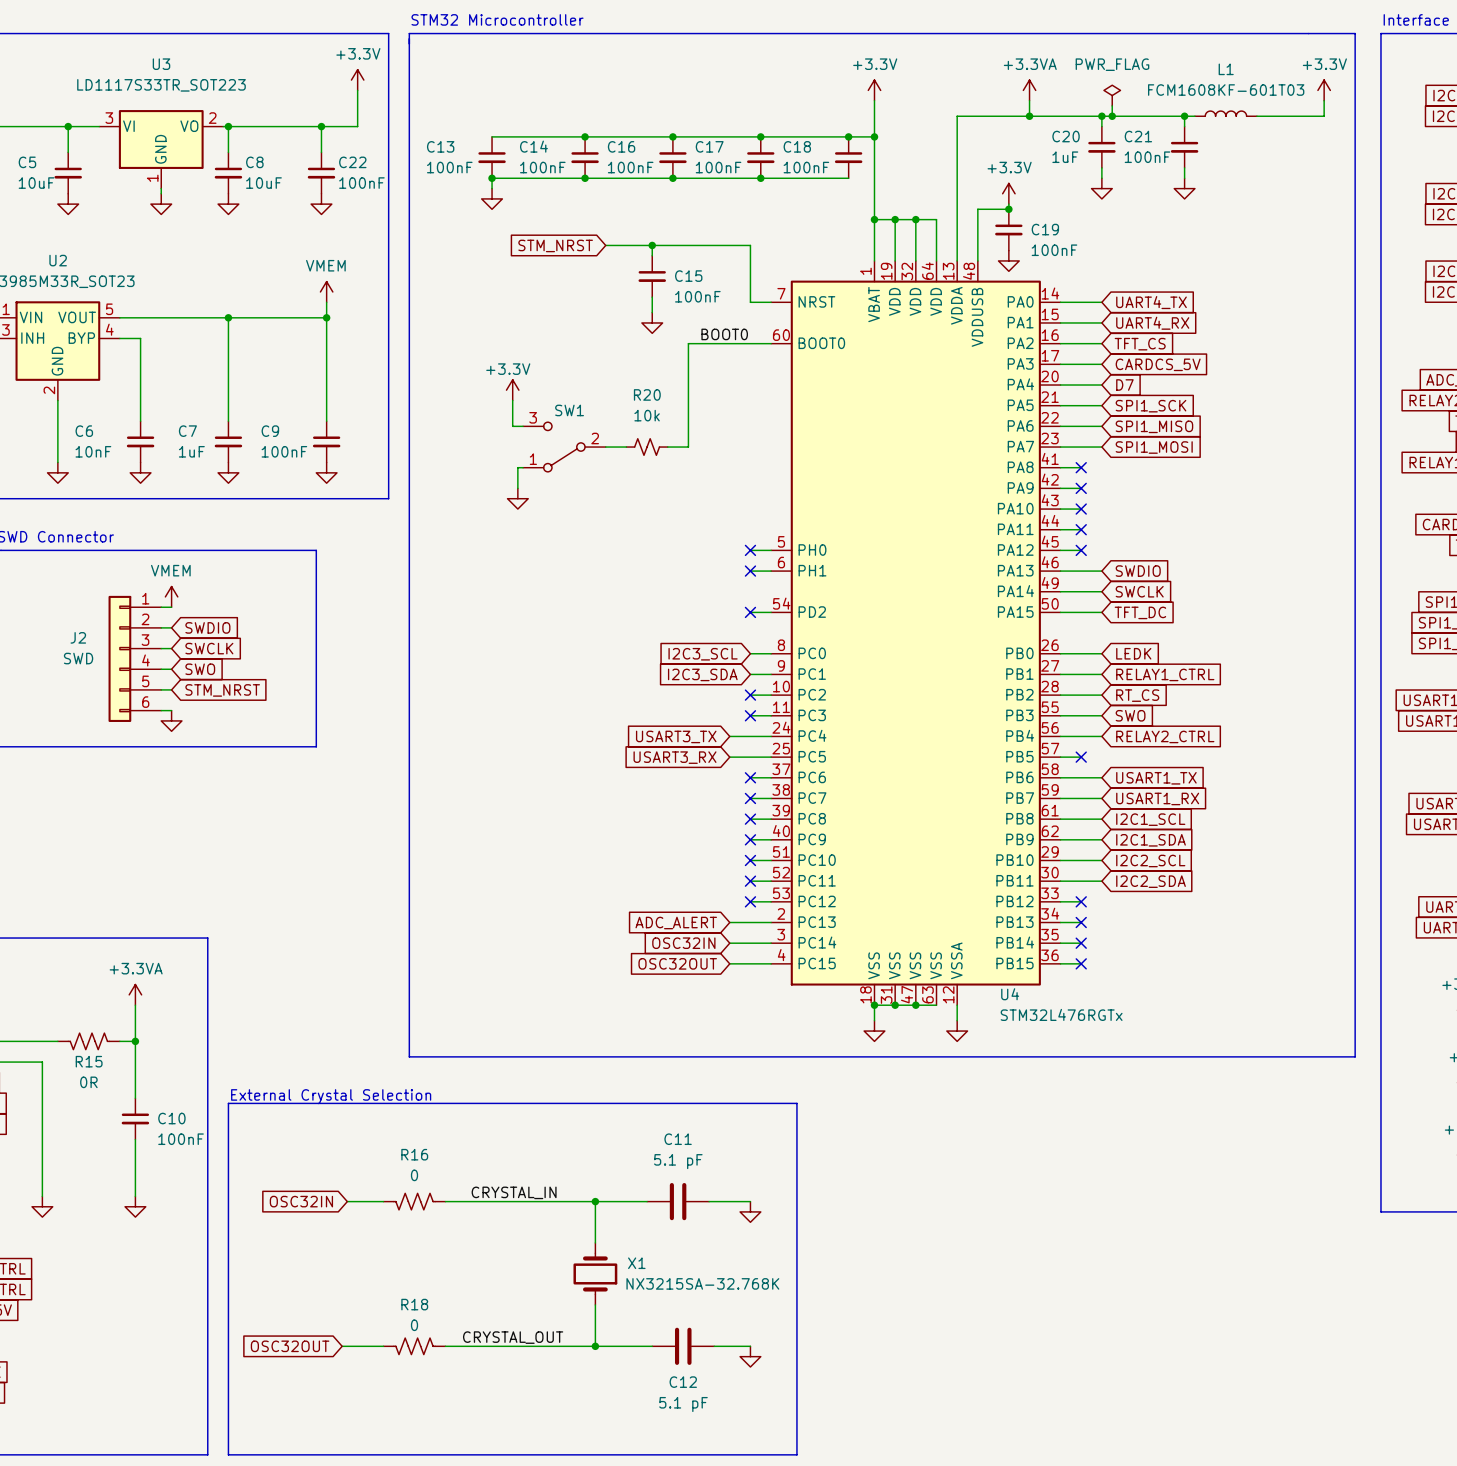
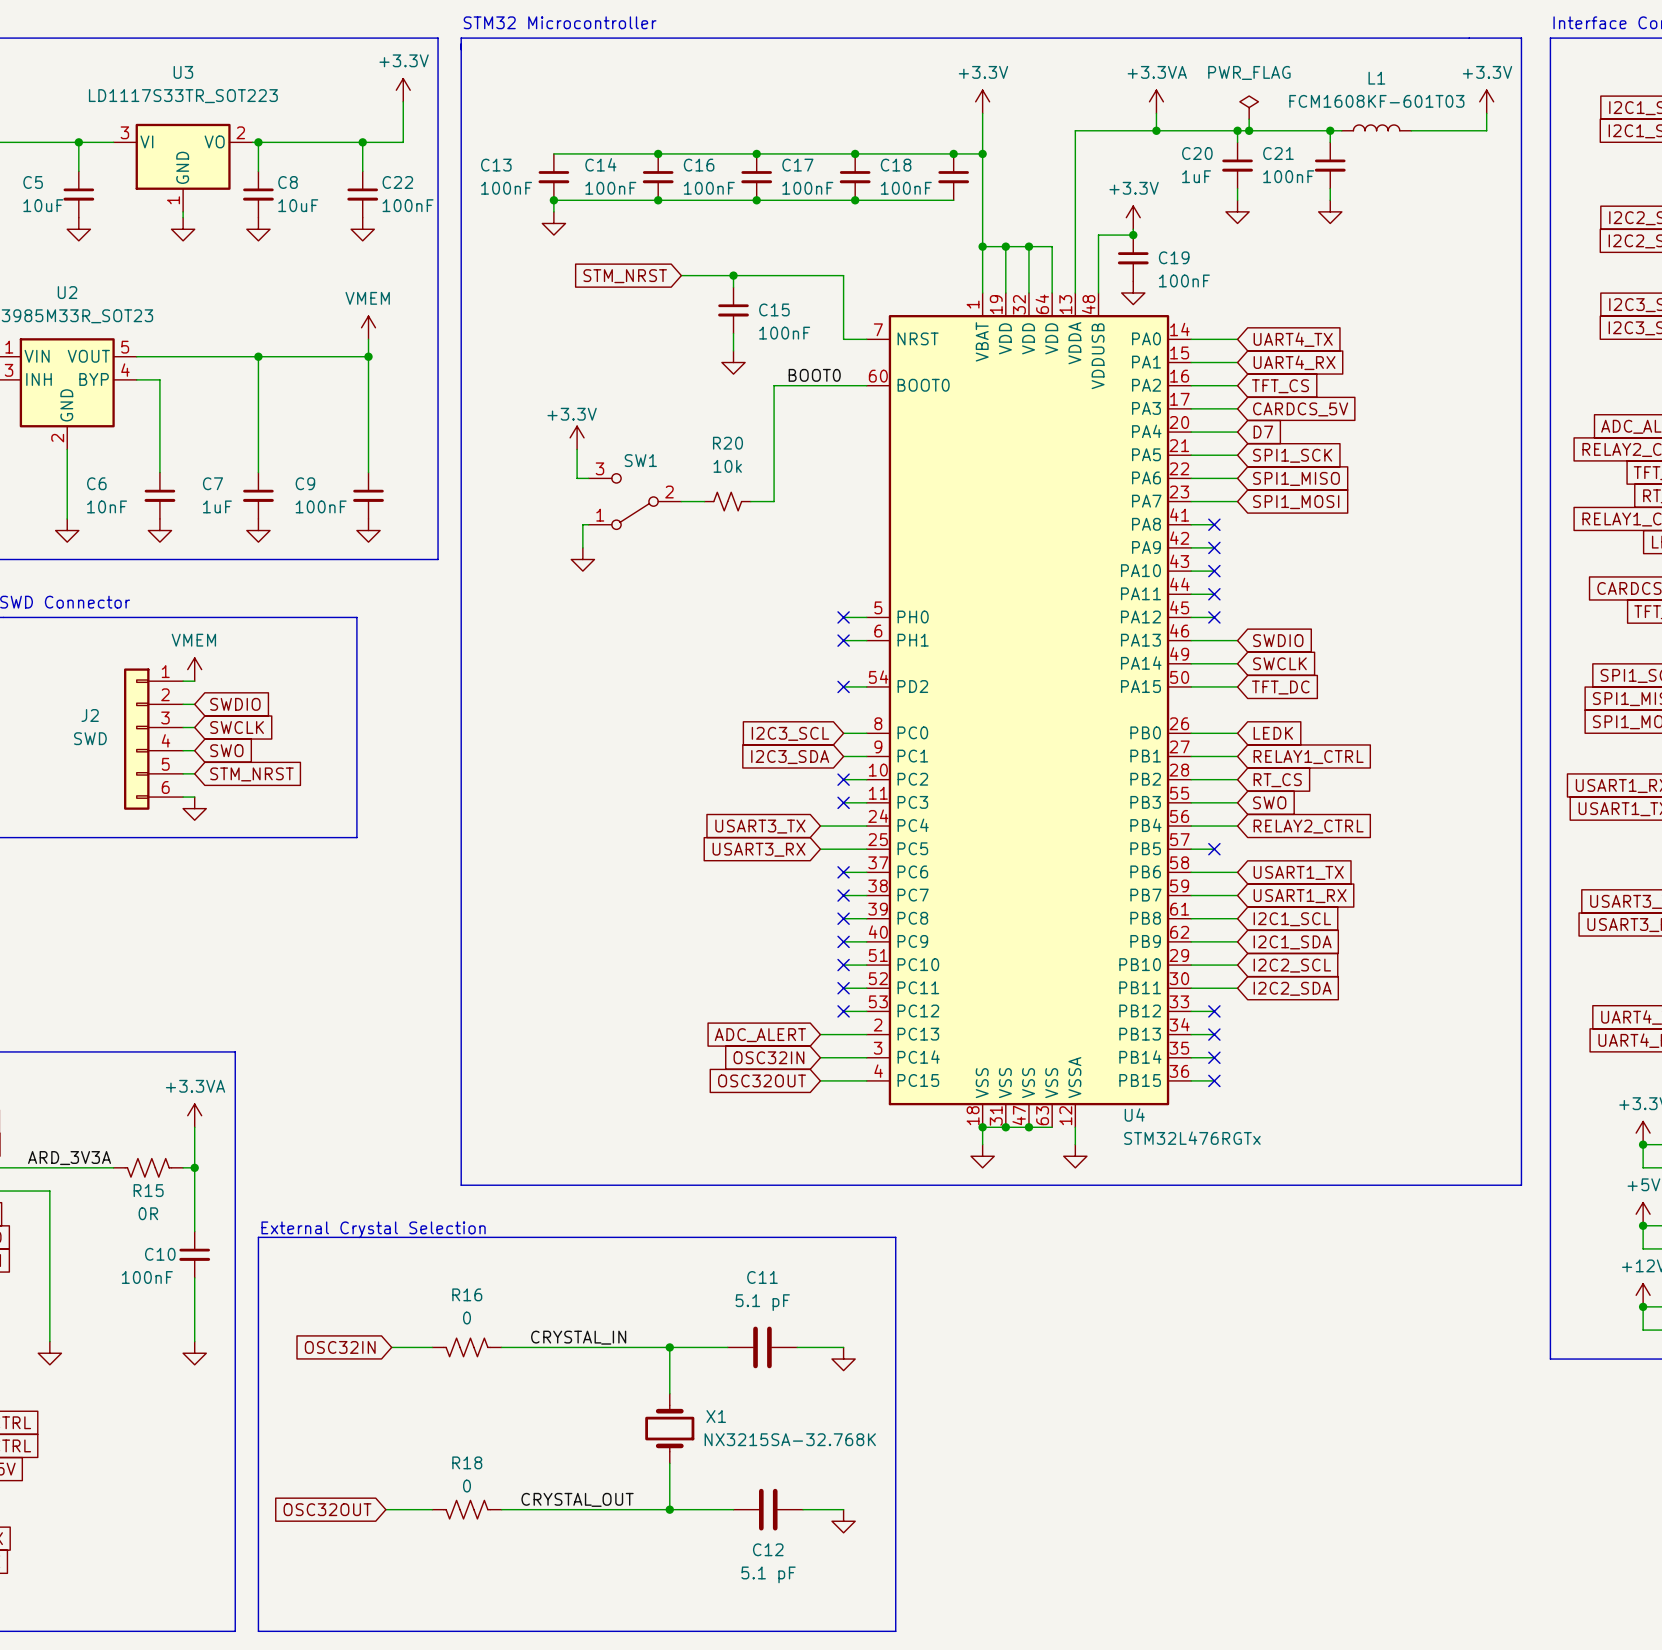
power symbol position: +3.3VA (135, 994) -> +3.3VA (194, 1115)
wire: (135, 1005) (135, 1098) -> (194, 1127) (194, 1231)
label: none -> ARD_3V3A (69, 1158)
wire: none -> (67, 1167) (113, 1167)
R15 position: (88, 1041) -> (148, 1167)
wire: (119, 1041) (135, 1041) -> none
junction position: (135, 1041) -> (194, 1167)
wire: none -> (183, 1167) (194, 1167)
C10 position: (135, 1118) -> (194, 1254)
C10 name position: C10 (171, 1118) -> C10 (160, 1254)
wire: (135, 1139) (135, 1196) -> (194, 1277) (194, 1341)
C10 value position: 100nF (181, 1139) -> 100nF (147, 1277)
power symbol position: (135, 1206) -> (194, 1353)

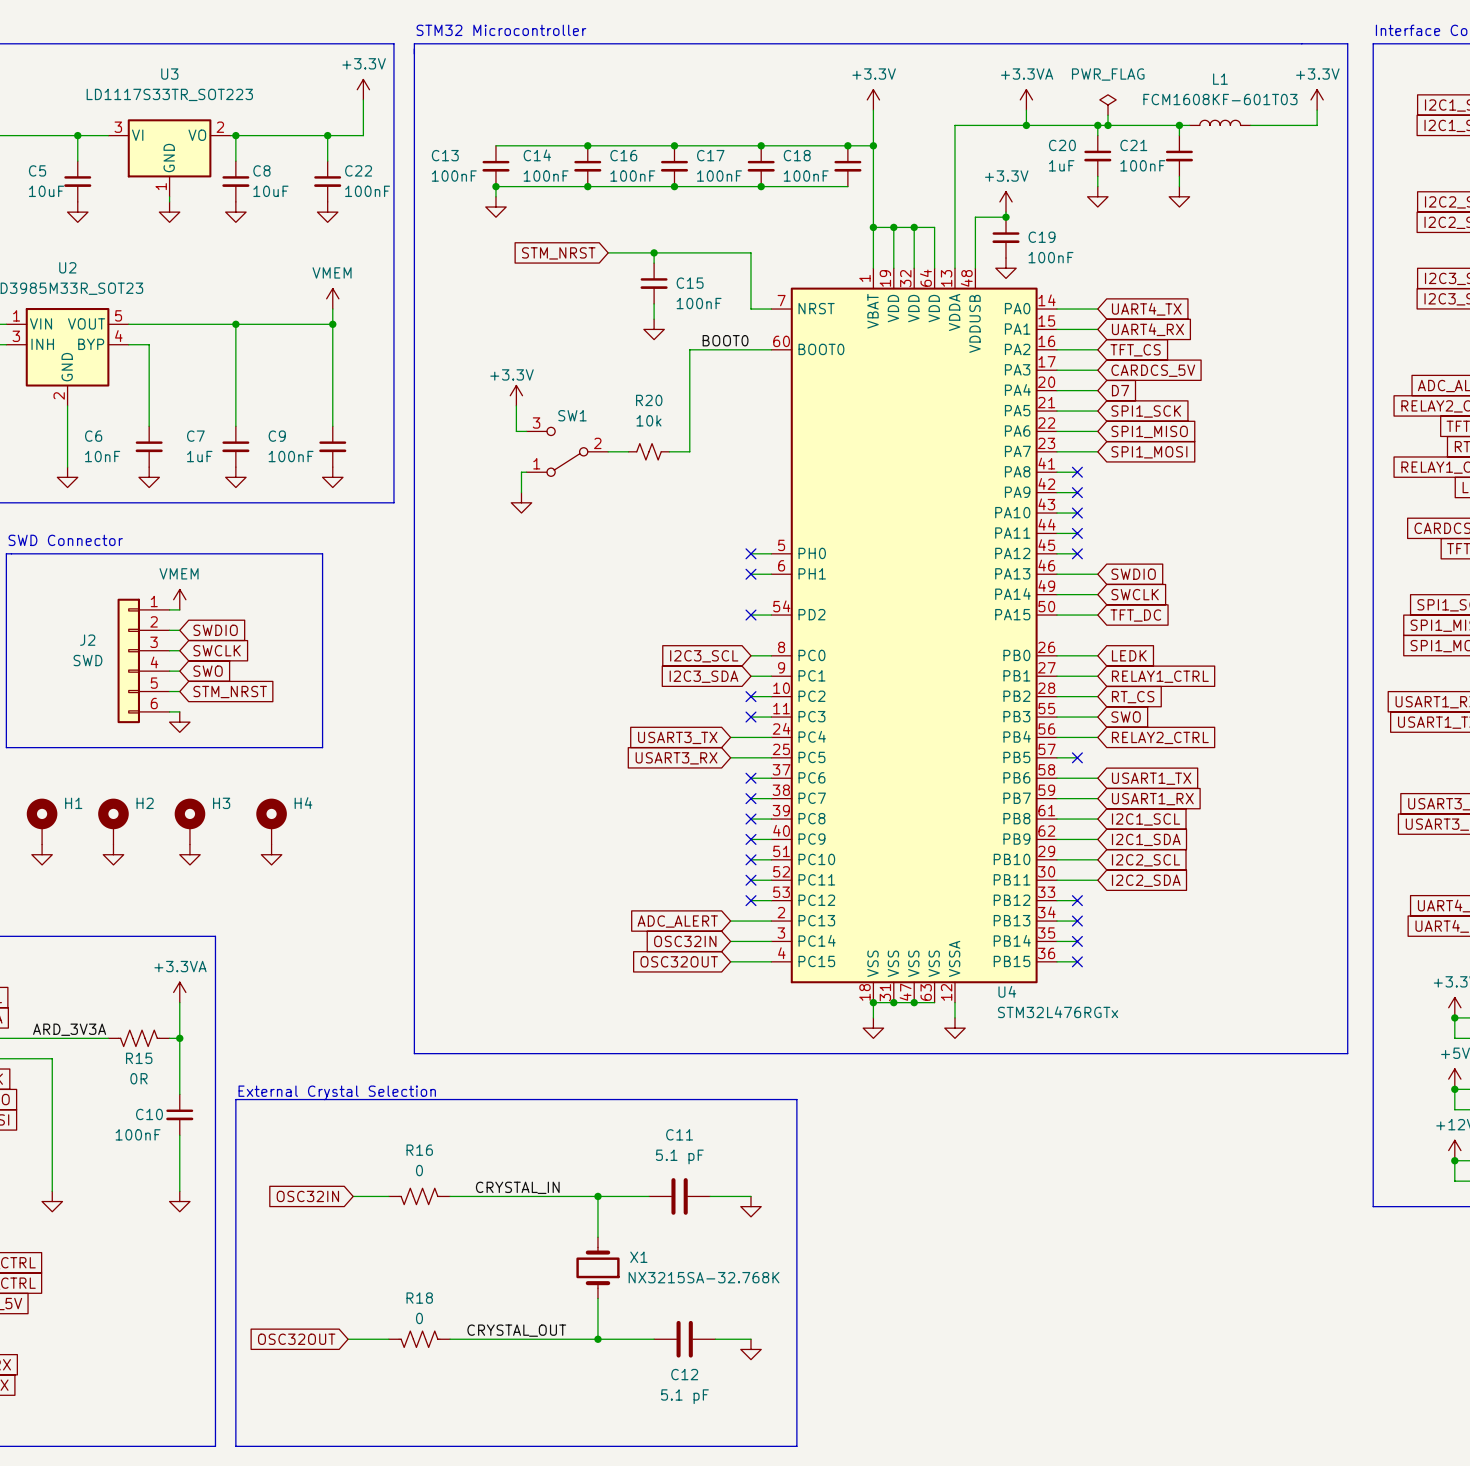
H1: none -> (42, 821)
H2: none -> (113, 821)
H3: none -> (189, 821)
H4: none -> (271, 821)
power symbol: none -> (42, 854)
power symbol: none -> (113, 854)
power symbol: none -> (189, 854)
power symbol: none -> (271, 854)

